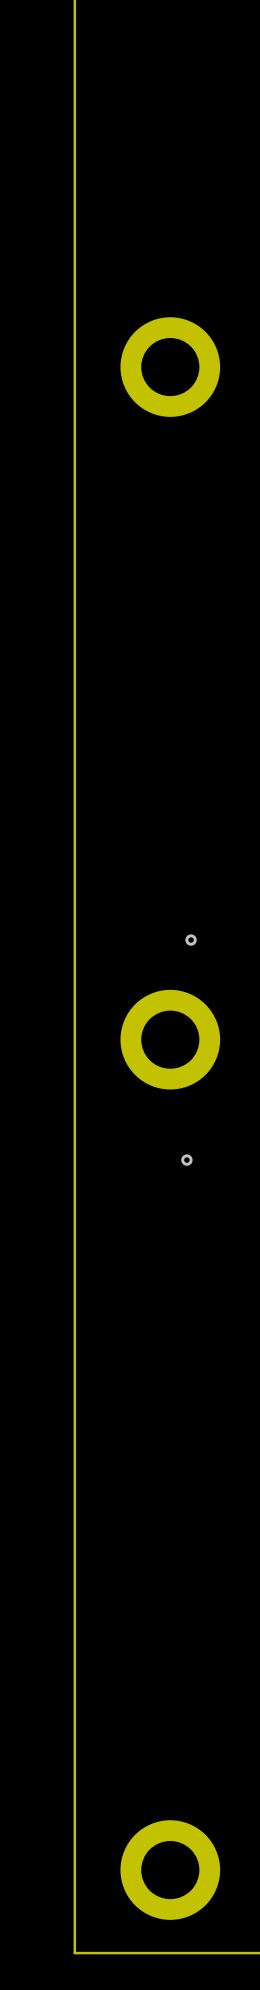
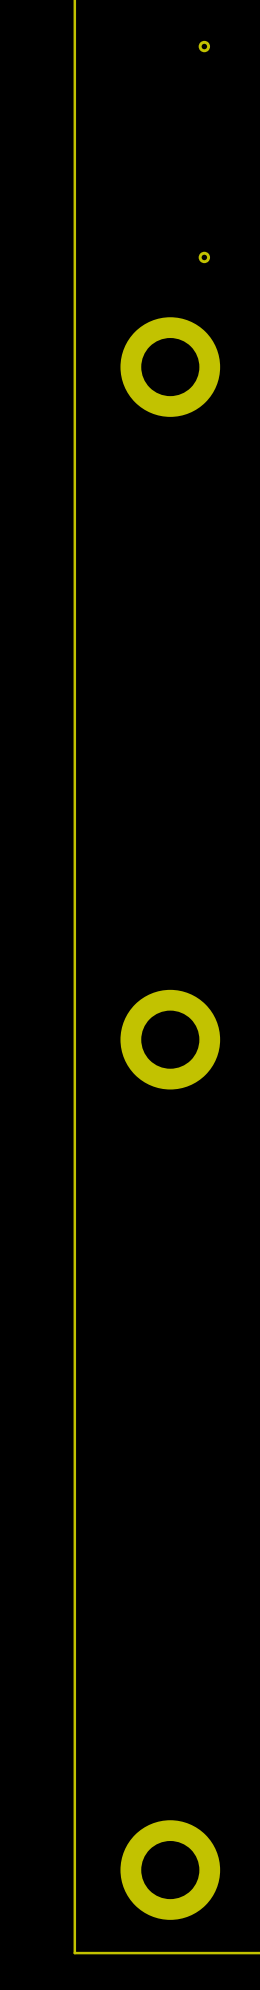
part: none -> (204, 46)
part: none -> (204, 257)
via: (191, 940) -> none
via: (186, 1160) -> none

